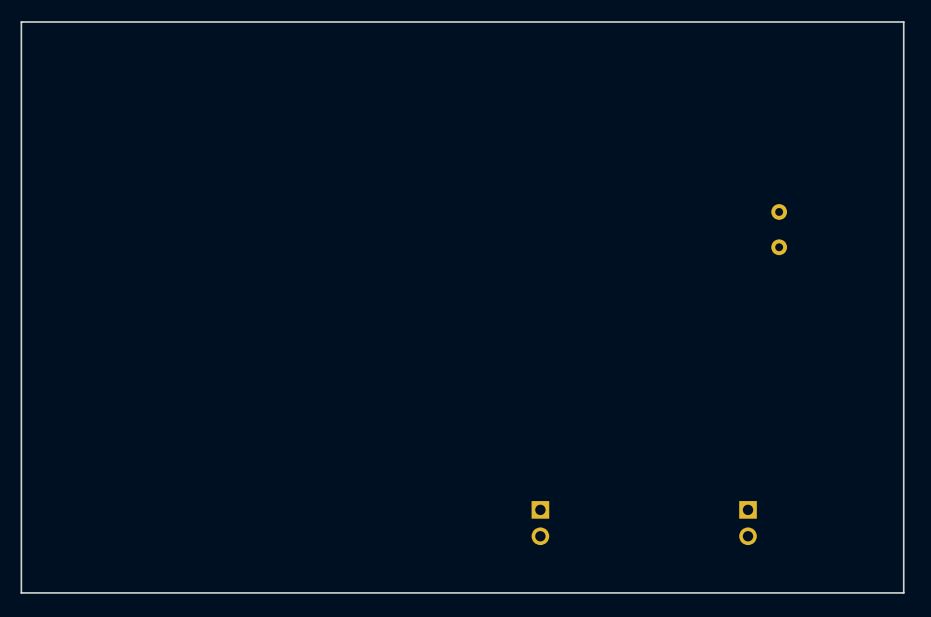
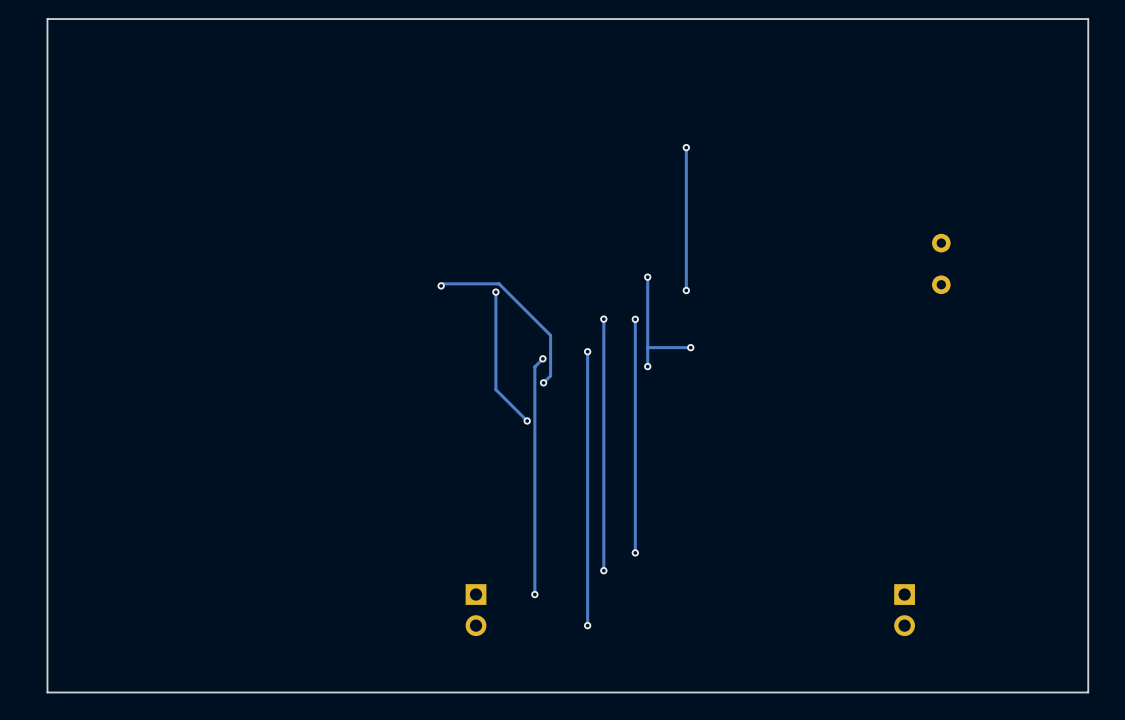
track: none -> (686, 147) (686, 290)
via: none -> (686, 147)
track: none -> (647, 277) (647, 366)
via: none -> (647, 277)
track: none -> (441, 285) (443, 283) (499, 283) (550, 335) (550, 375) (543, 382)
via: none -> (441, 285)
via: none -> (686, 290)
track: none -> (495, 292) (495, 389) (527, 420)
via: none -> (495, 292)
track: none -> (603, 319) (603, 570)
via: none -> (603, 319)
track: none -> (635, 319) (635, 552)
via: none -> (635, 319)
track: none -> (690, 347) (647, 347)
via: none -> (690, 347)
track: none -> (587, 351) (587, 625)
via: none -> (587, 351)
track: none -> (542, 358) (534, 366) (534, 594)
via: none -> (542, 358)
via: none -> (647, 366)
via: none -> (543, 382)
via: none -> (527, 420)
via: none -> (635, 552)
via: none -> (603, 570)
via: none -> (534, 594)
part position: (540, 523) -> (476, 610)
via: none -> (587, 625)

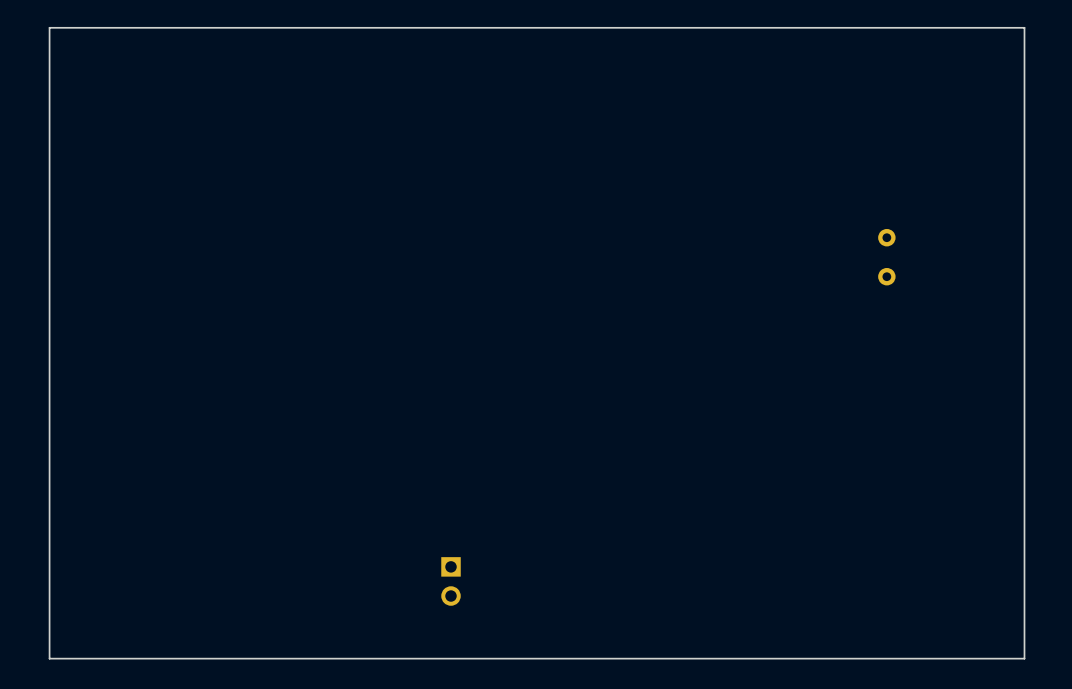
track: (686, 147) (686, 290) -> none
via: (686, 147) -> none
track: (647, 277) (647, 366) -> none
via: (647, 277) -> none
track: (441, 285) (443, 283) (499, 283) (550, 335) (550, 375) (543, 382) -> none
via: (441, 285) -> none
via: (686, 290) -> none
track: (495, 292) (495, 389) (527, 420) -> none
via: (495, 292) -> none
track: (603, 319) (603, 570) -> none
via: (603, 319) -> none
track: (635, 319) (635, 552) -> none
via: (635, 319) -> none
track: (690, 347) (647, 347) -> none
via: (690, 347) -> none
track: (587, 351) (587, 625) -> none
via: (587, 351) -> none
track: (542, 358) (534, 366) (534, 594) -> none
via: (542, 358) -> none
via: (647, 366) -> none
via: (543, 382) -> none
via: (527, 420) -> none
via: (635, 552) -> none
via: (603, 570) -> none
via: (534, 594) -> none
part: (904, 610) -> none
via: (587, 625) -> none

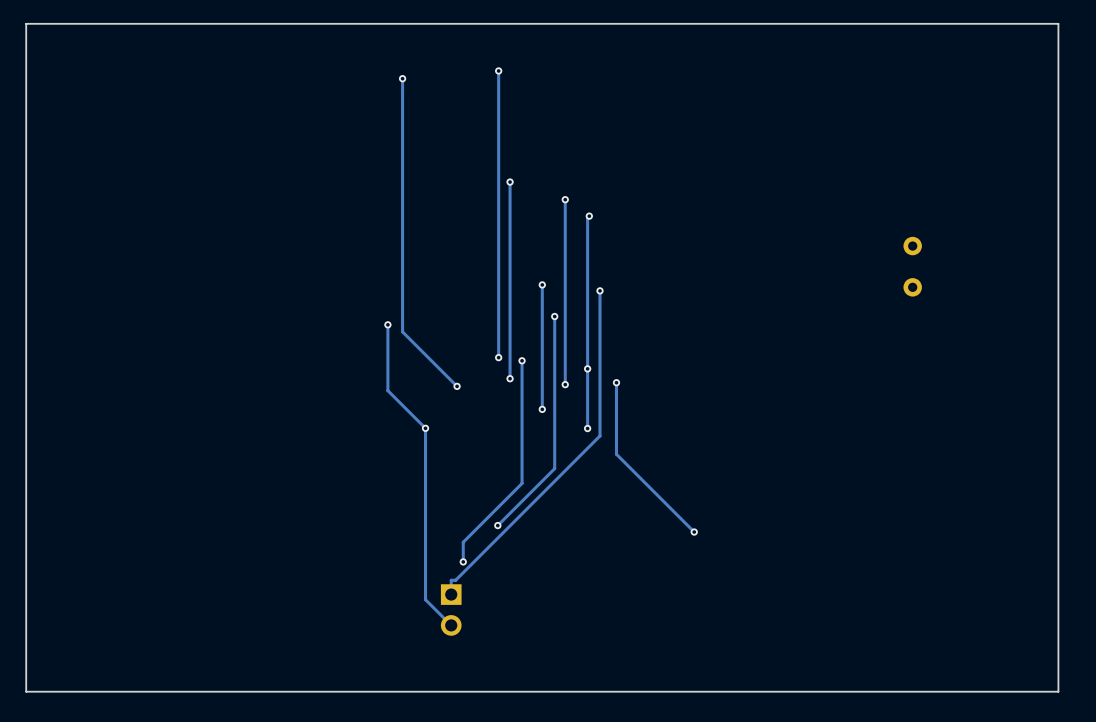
track: none -> (498, 70) (498, 357)
via: none -> (498, 70)
track: none -> (402, 78) (402, 331) (457, 386)
via: none -> (402, 78)
track: none -> (510, 182) (510, 378)
via: none -> (510, 182)
track: none -> (565, 199) (565, 384)
via: none -> (565, 199)
track: none -> (589, 216) (587, 217) (587, 428)
via: none -> (589, 216)
track: none -> (542, 284) (542, 409)
via: none -> (542, 284)
track: none -> (599, 290) (599, 435) (455, 580) (451, 580) (451, 594)
via: none -> (599, 290)
track: none -> (554, 316) (554, 468) (497, 525)
via: none -> (554, 316)
track: none -> (387, 324) (387, 390) (425, 428) (425, 599) (451, 625)
via: none -> (387, 324)
via: none -> (498, 357)
track: none -> (522, 360) (522, 483) (463, 542) (463, 561)
via: none -> (522, 360)
via: none -> (587, 368)
via: none -> (510, 378)
track: none -> (616, 382) (616, 454) (694, 532)
via: none -> (616, 382)
via: none -> (565, 384)
via: none -> (457, 386)
via: none -> (542, 409)
via: none -> (425, 428)
via: none -> (587, 428)
via: none -> (497, 525)
via: none -> (694, 532)
via: none -> (463, 561)

